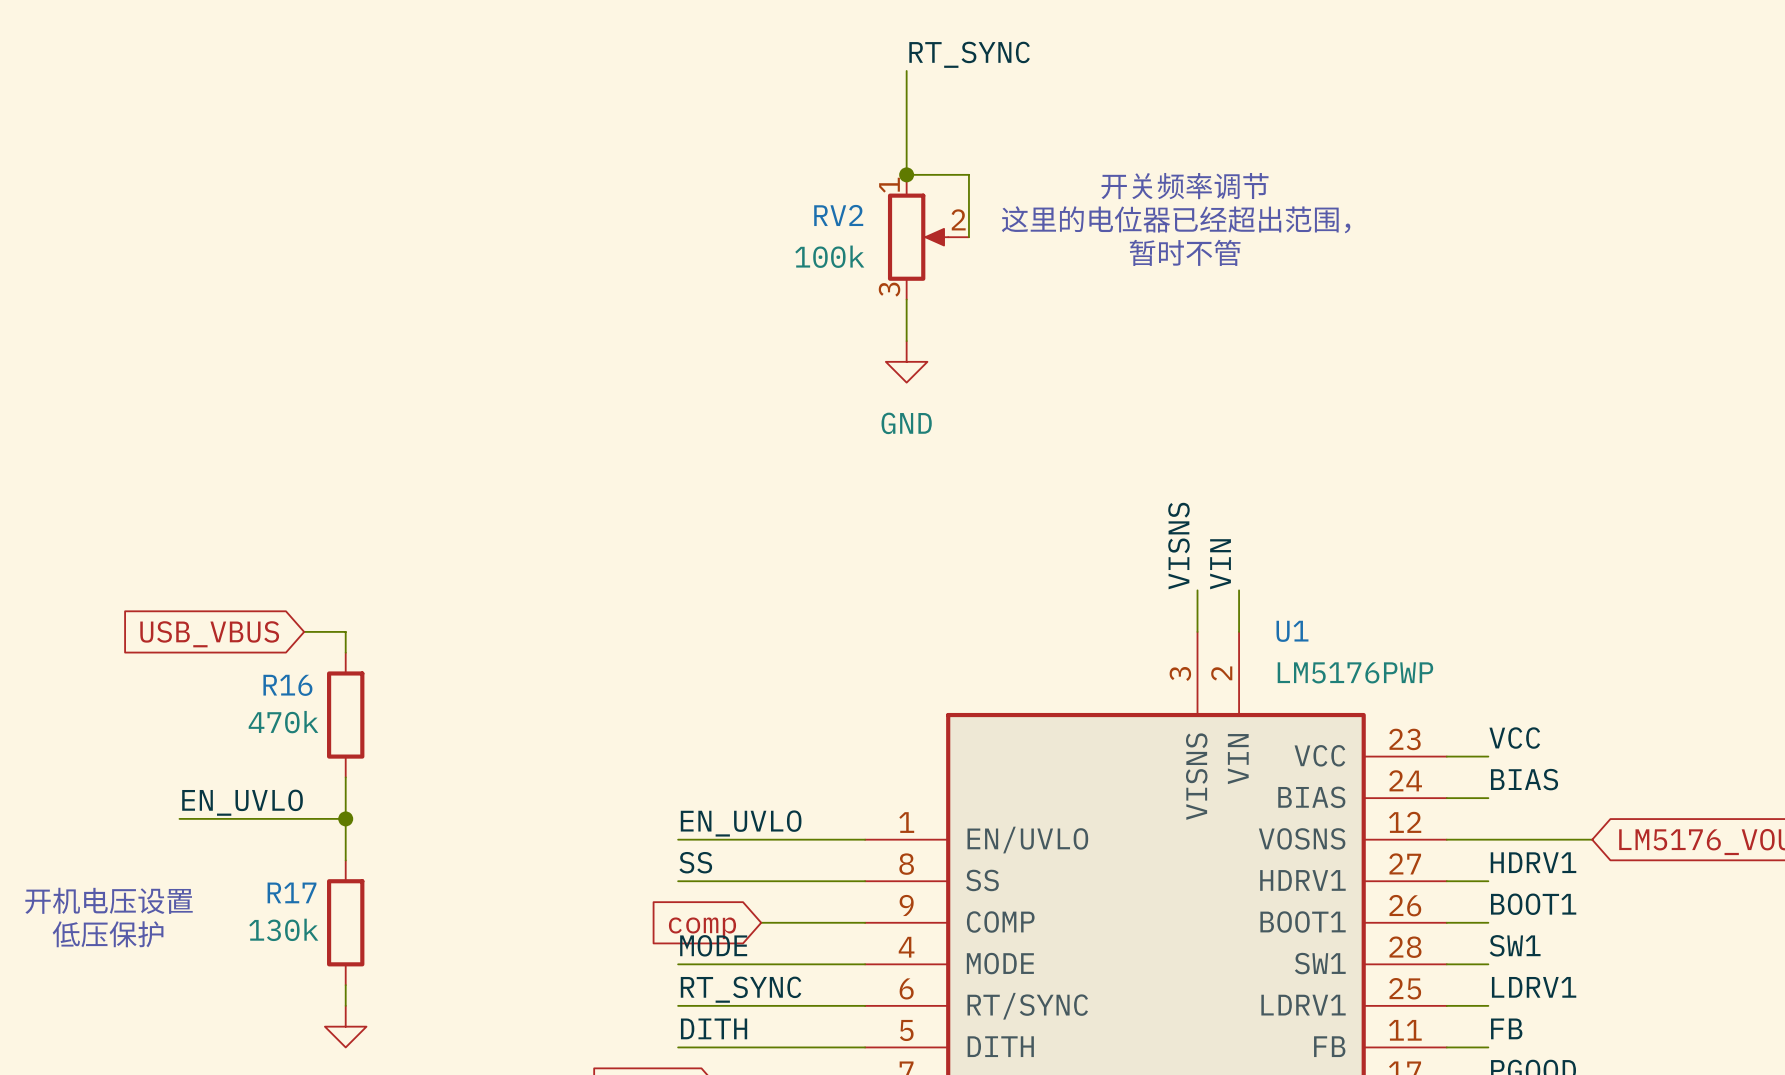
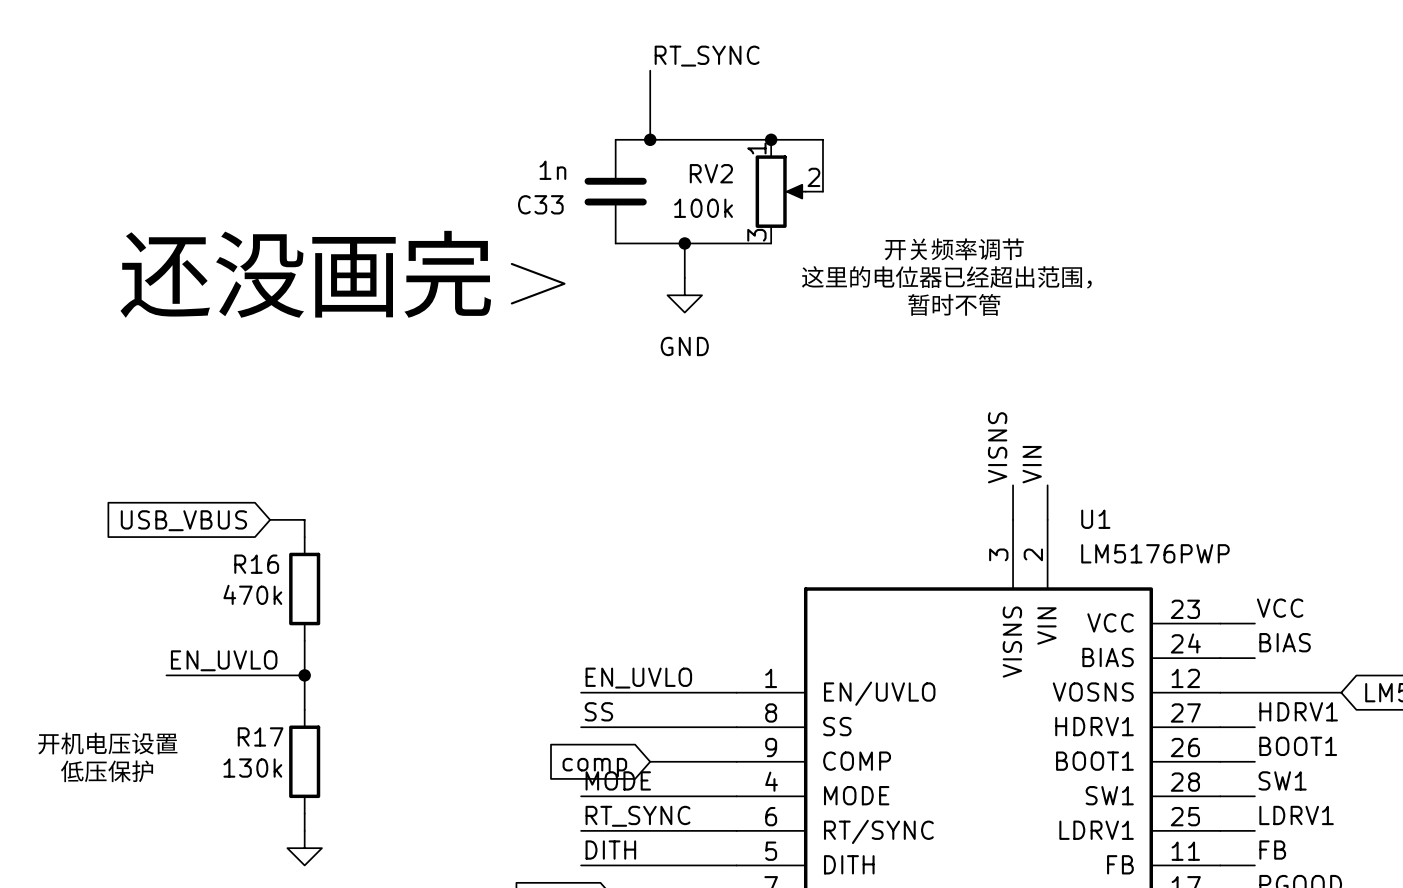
label position: RT_SYNC (969, 54) -> RT_SYNC (707, 56)
wire: (906, 70) (906, 174) -> (615, 139) (771, 139)
wire: none -> (650, 70) (650, 139)
junction: none -> (650, 139)
text position: 开关频率调节 (1185, 186) -> 开关频率调节 (954, 249)
text position: 这里的电位器已经超出范围， (1176, 219) -> 这里的电位器已经超出范围， (946, 277)
C33: none -> 1n (615, 191)
text position: 暂时不管 (1185, 252) -> 暂时不管 (954, 304)
wire: none -> (684, 243) (684, 278)
junction: none -> (684, 243)
wire: (906, 299) (906, 341) -> (771, 243) (615, 243)
text: none -> 还没画完> (342, 274)
power symbol position: GND (906, 361) -> GND (684, 295)

